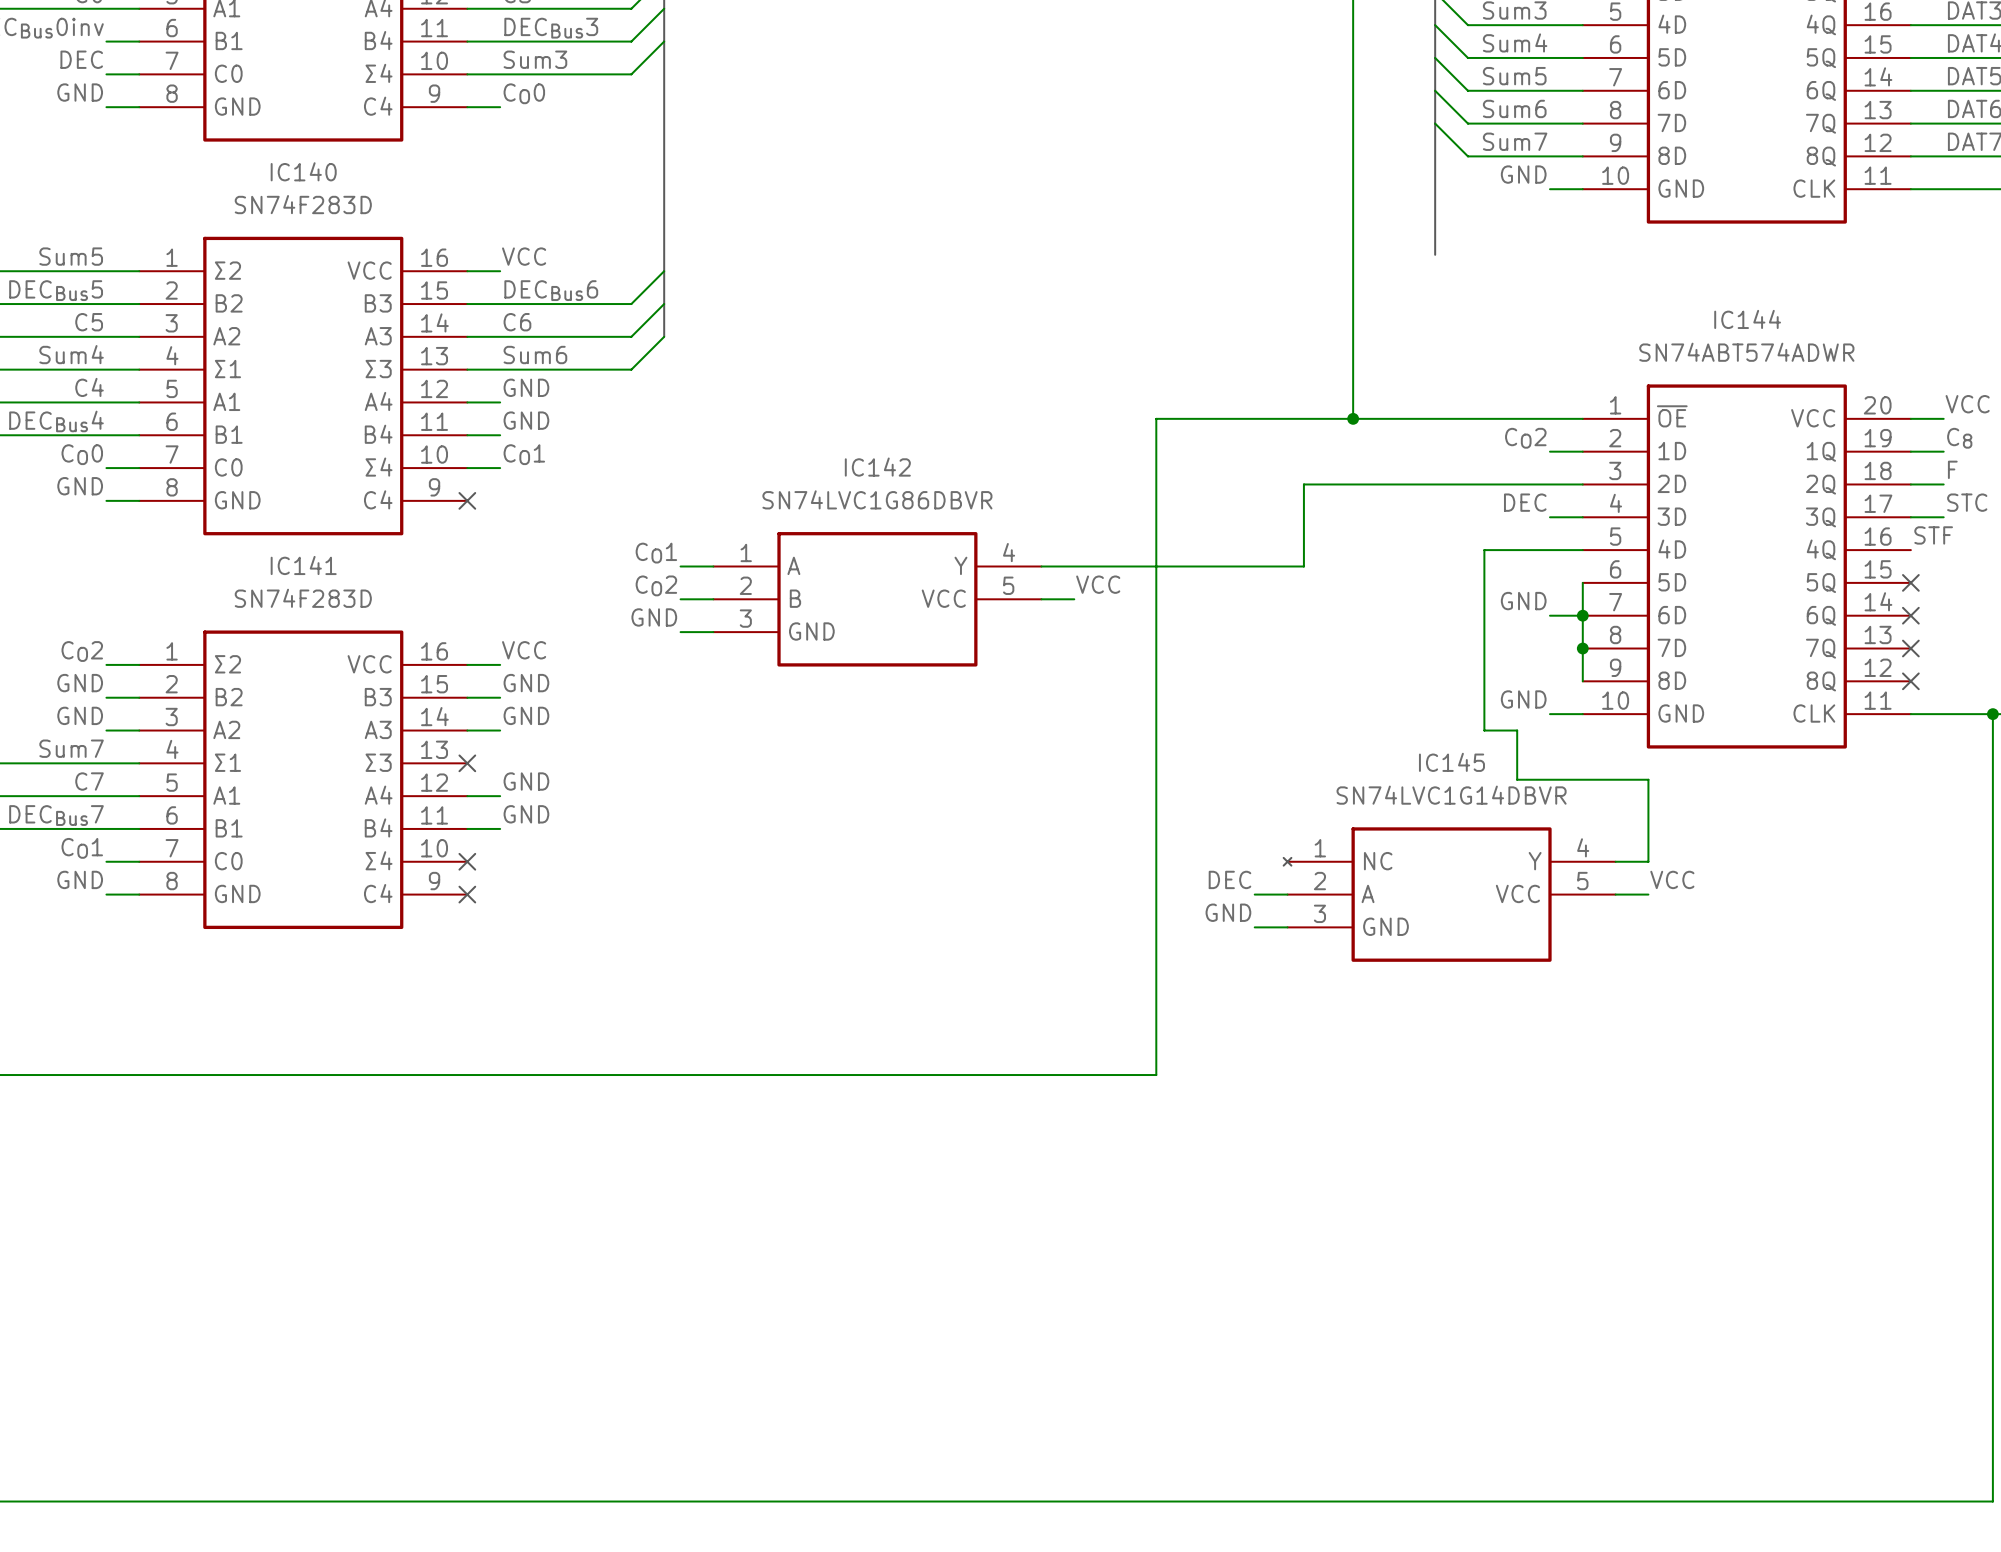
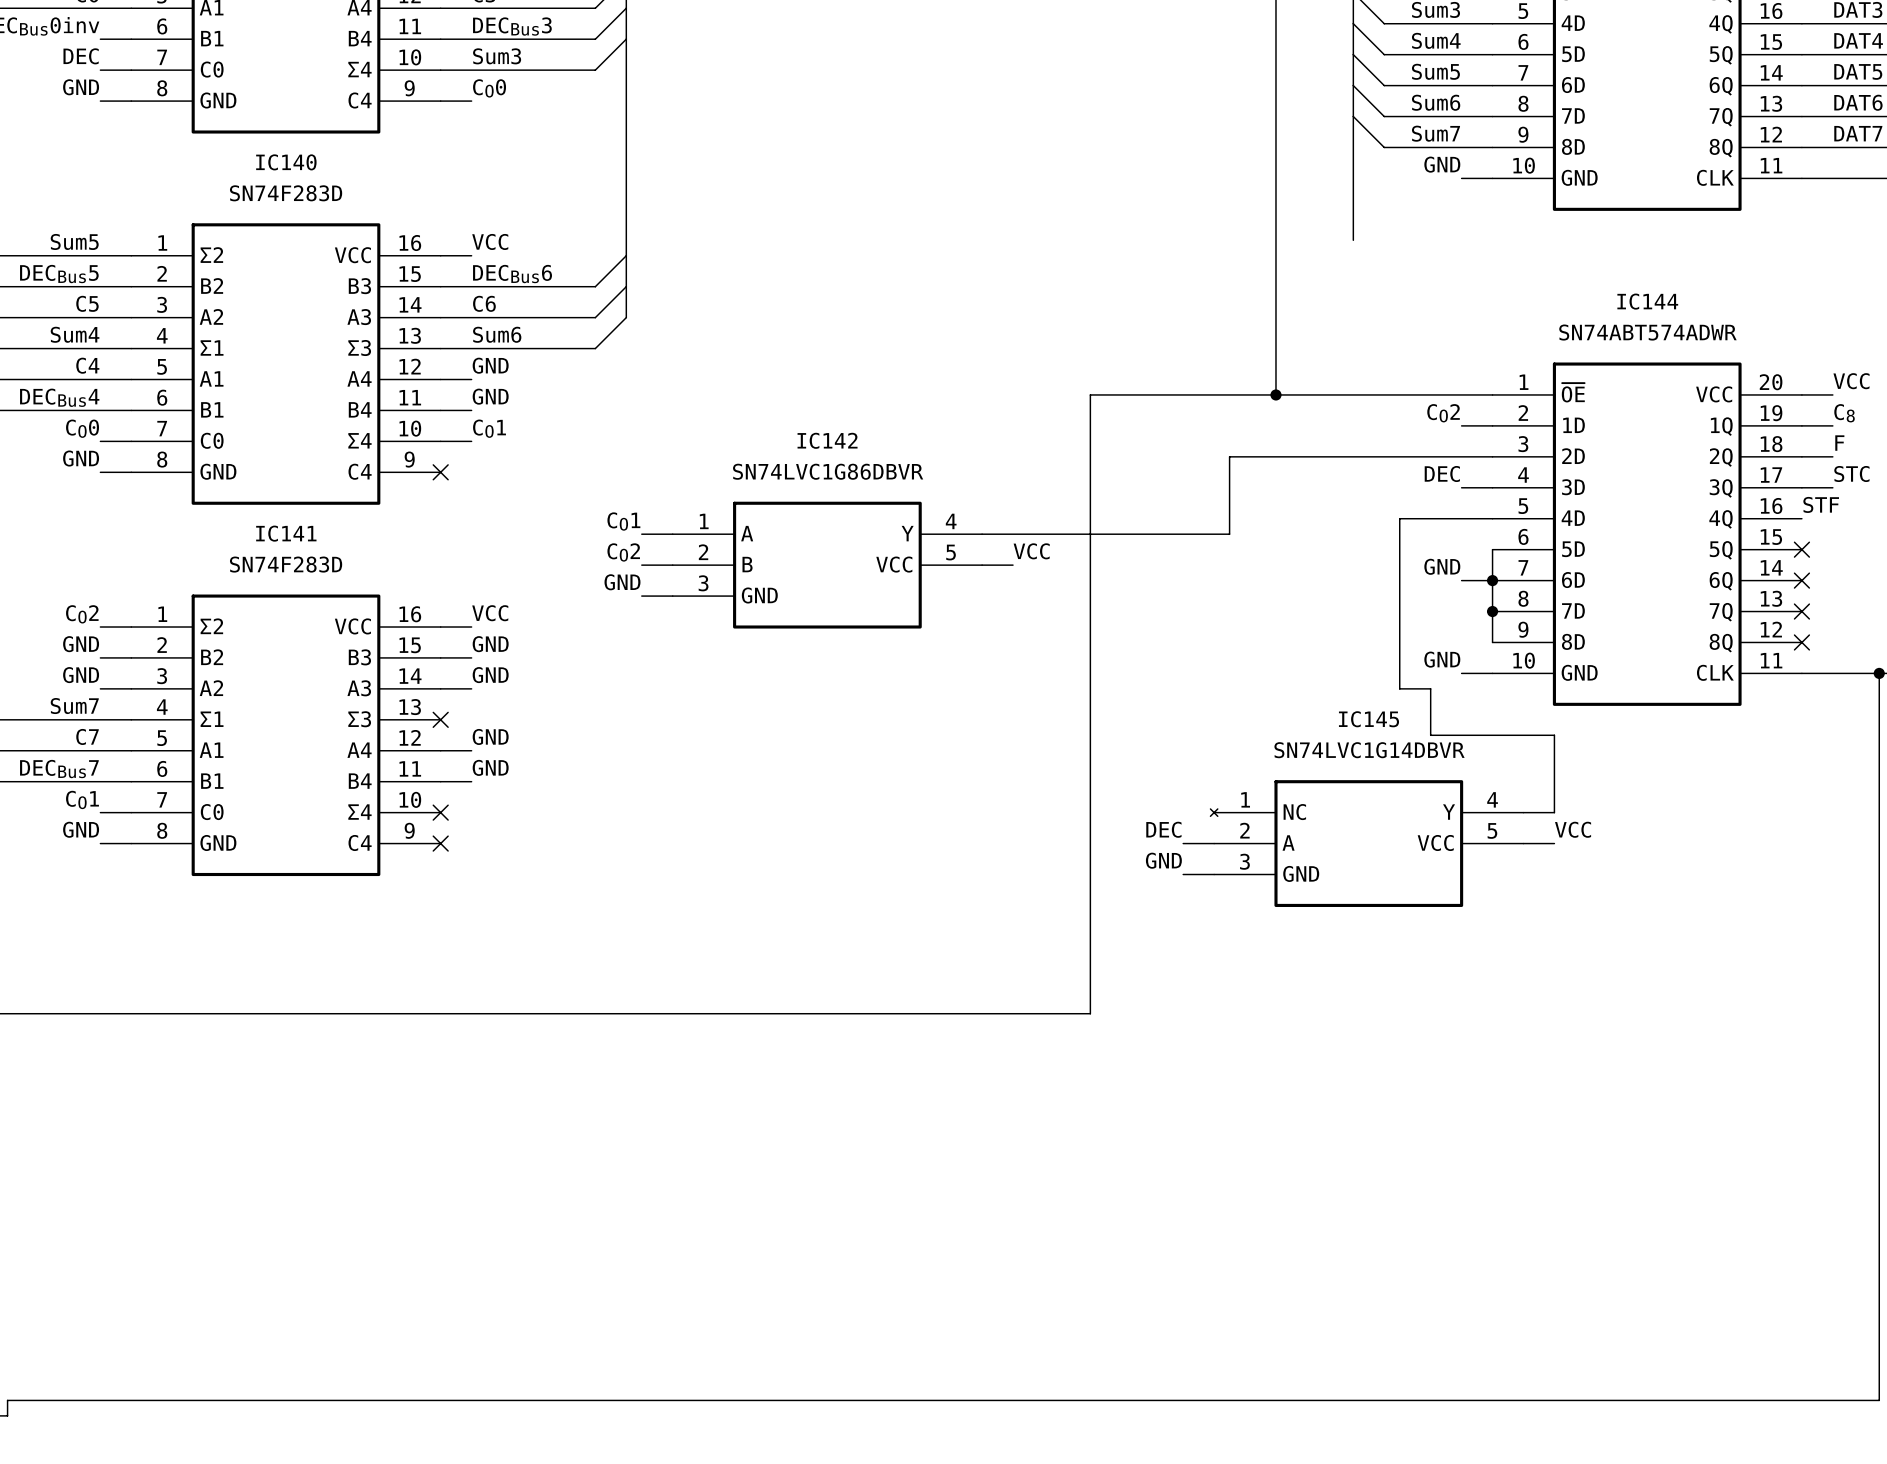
wire: (1992, 1485) (1992, 1501) (8, 1501) -> (1879, 1400) (7, 1400) (7, 1415)

